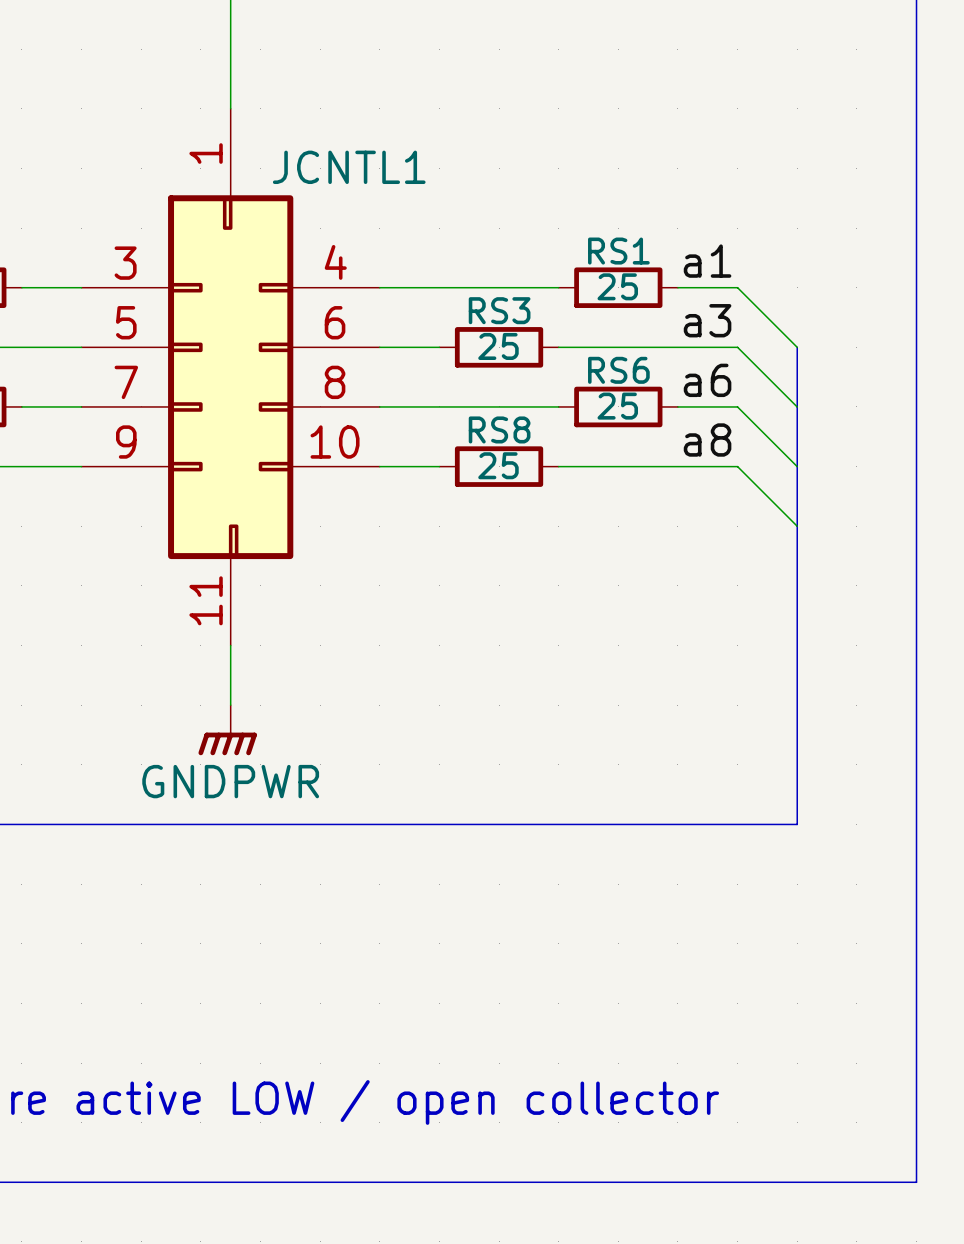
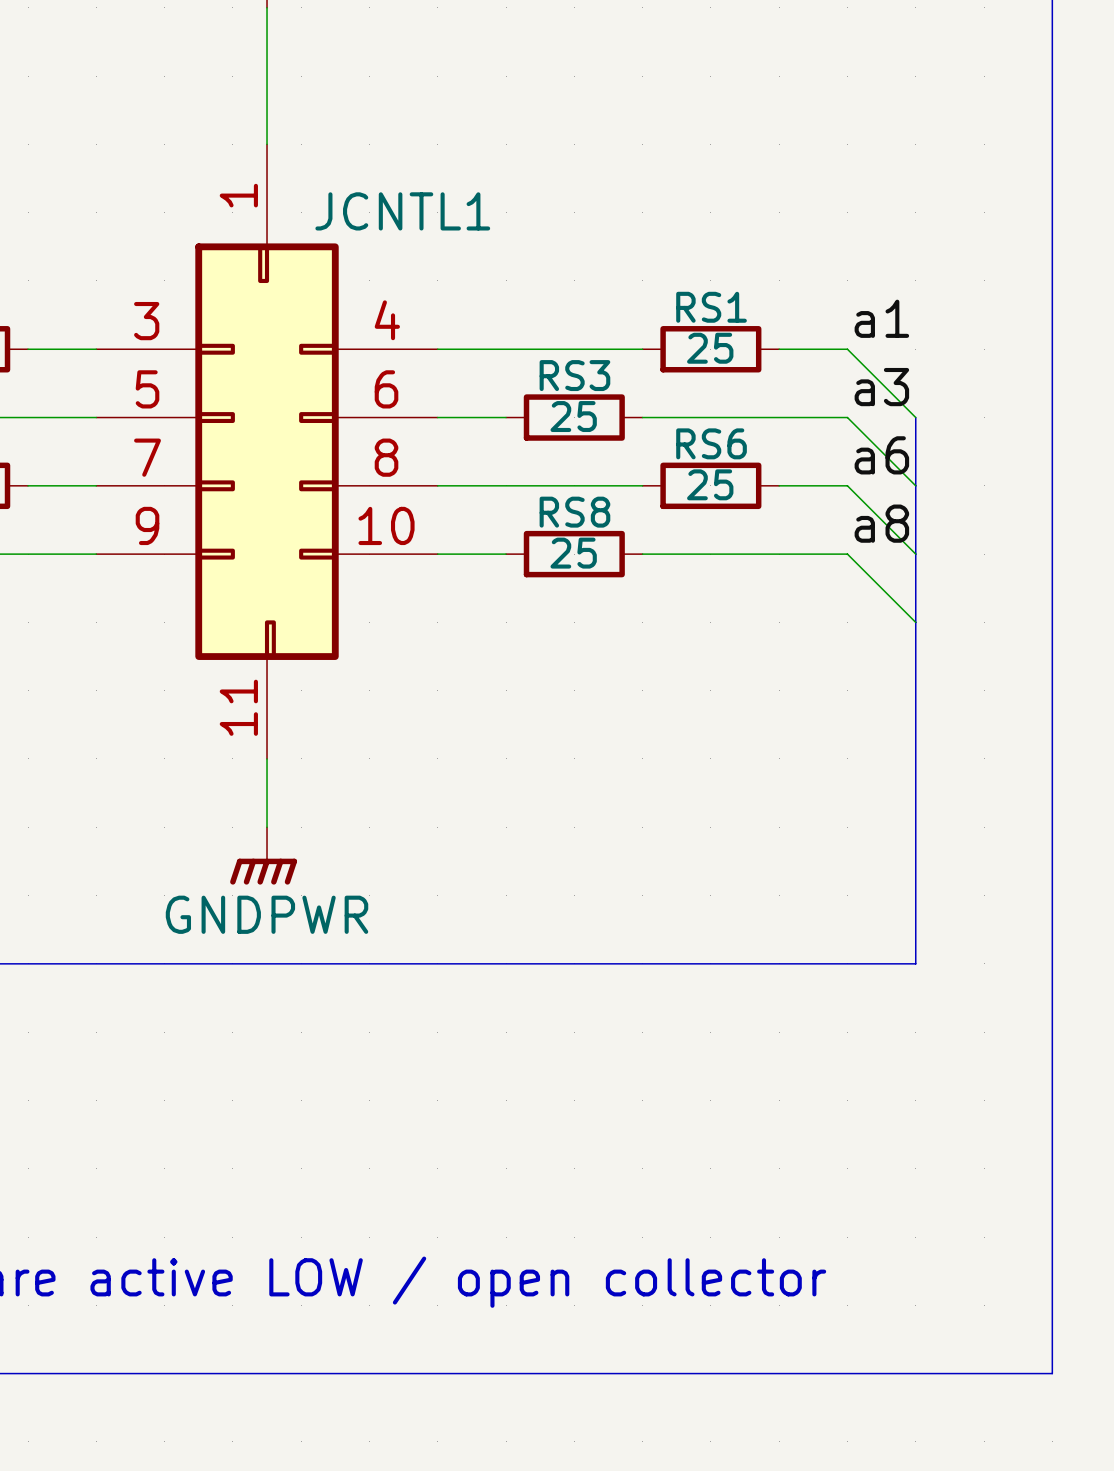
label position: a1 (707, 261) -> a1 (881, 318)
label position: a3 (707, 320) -> a3 (881, 387)
label position: a6 (707, 380) -> a6 (881, 455)
label position: a8 (707, 440) -> a8 (881, 523)

